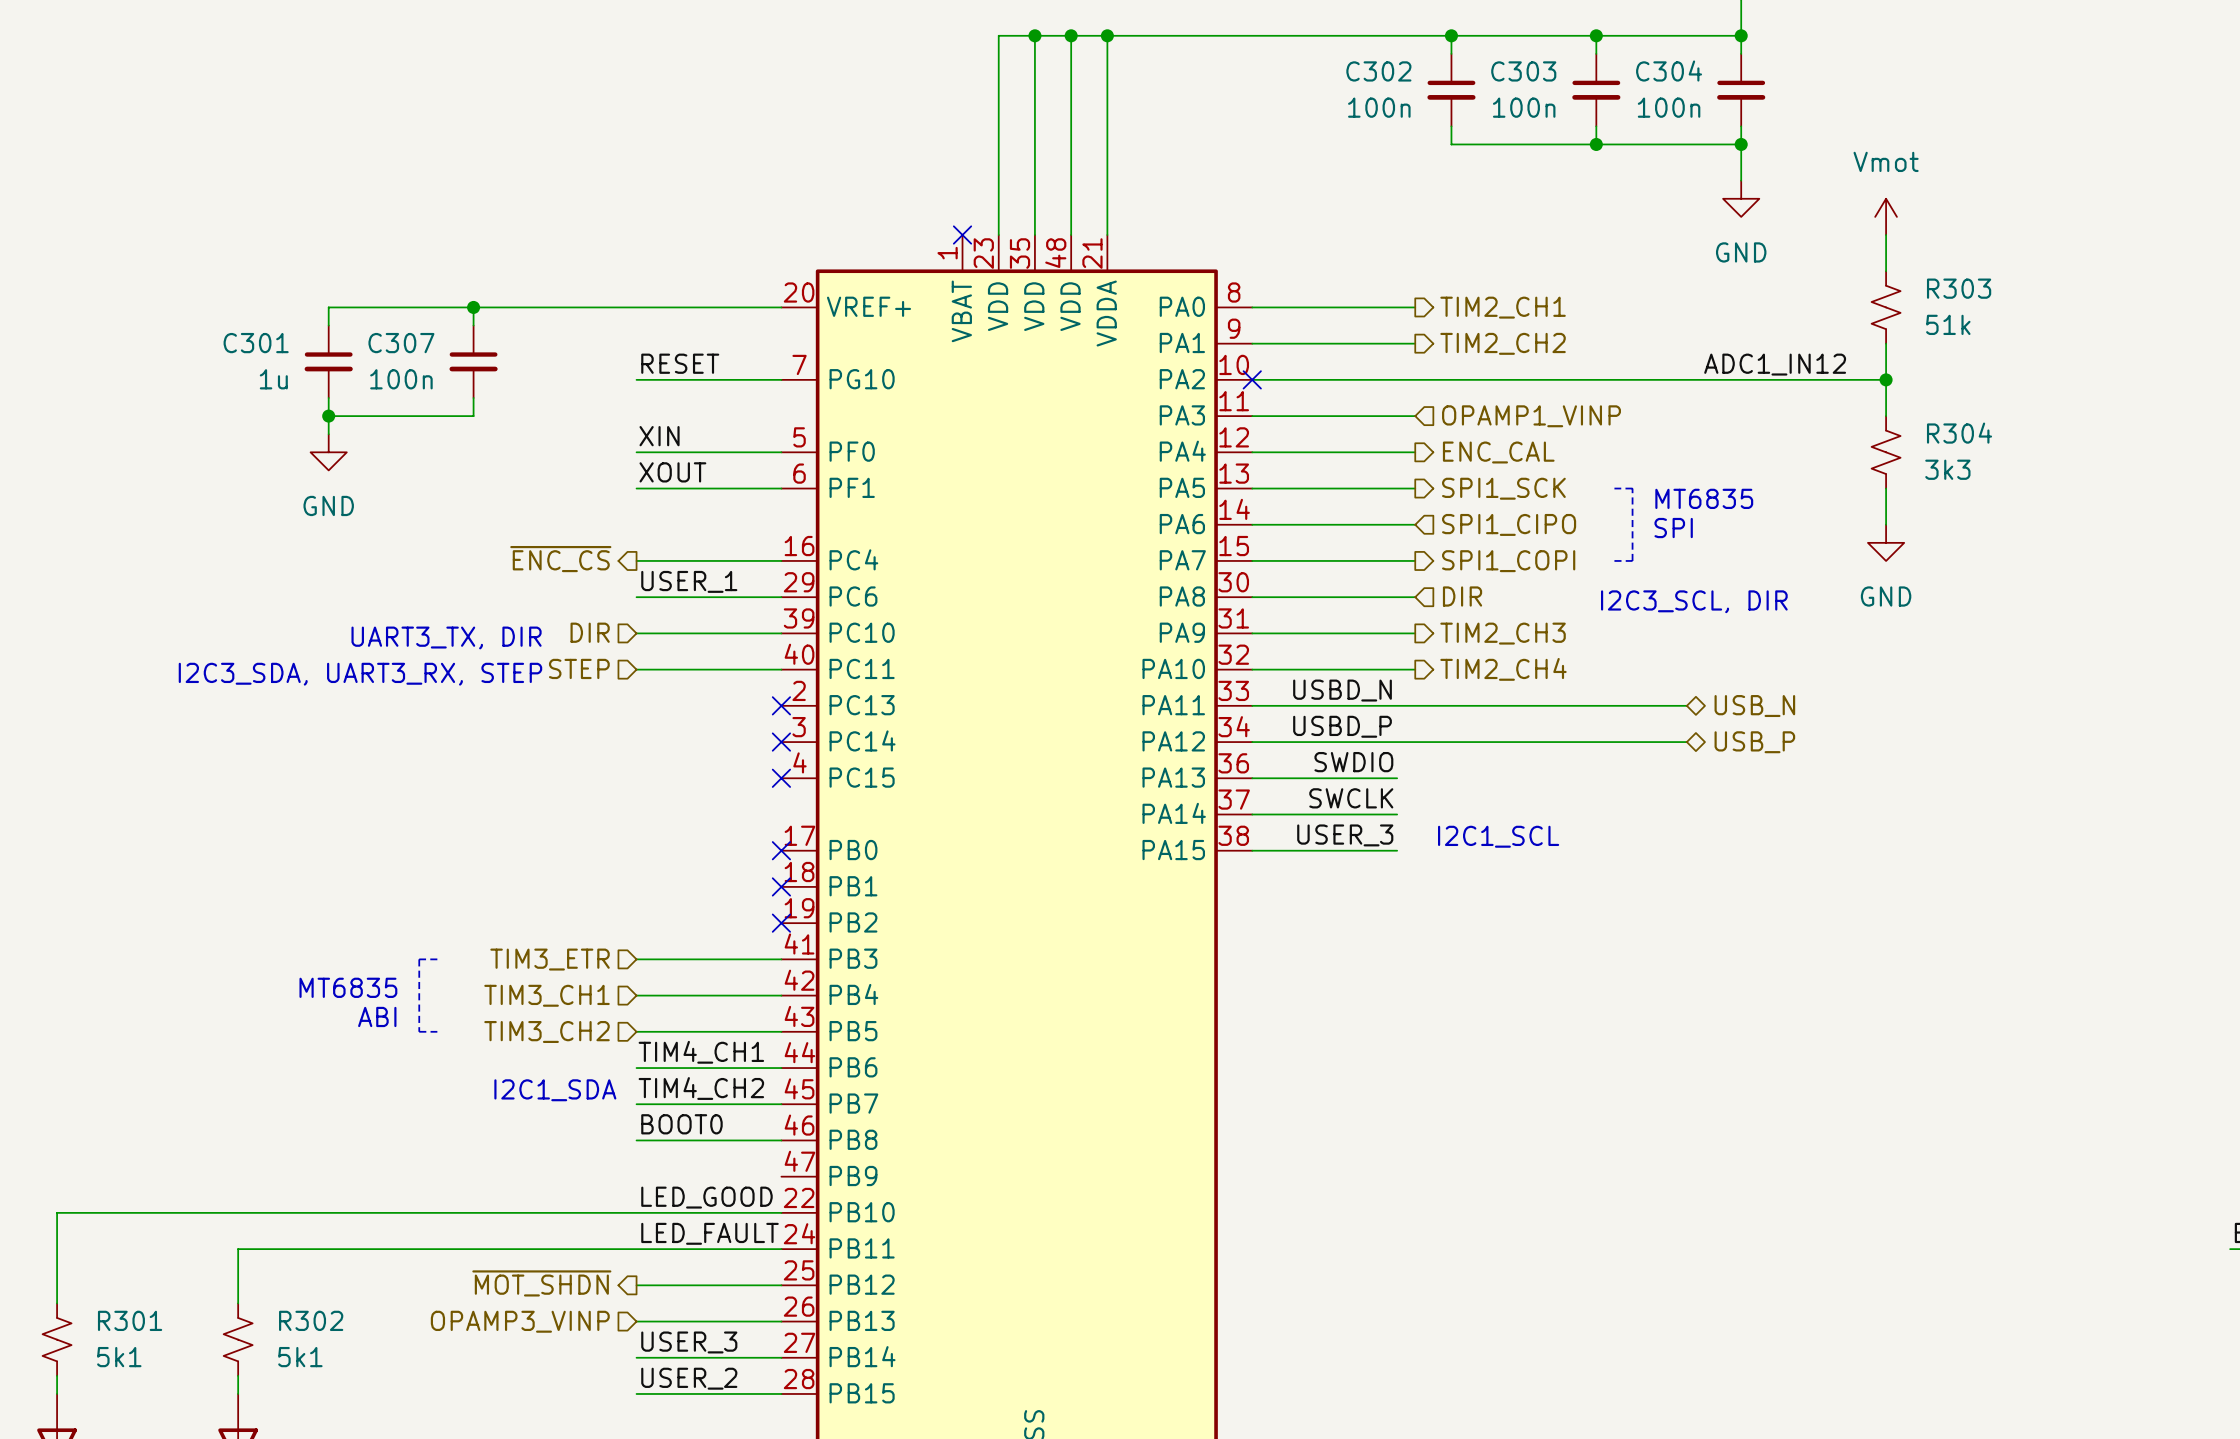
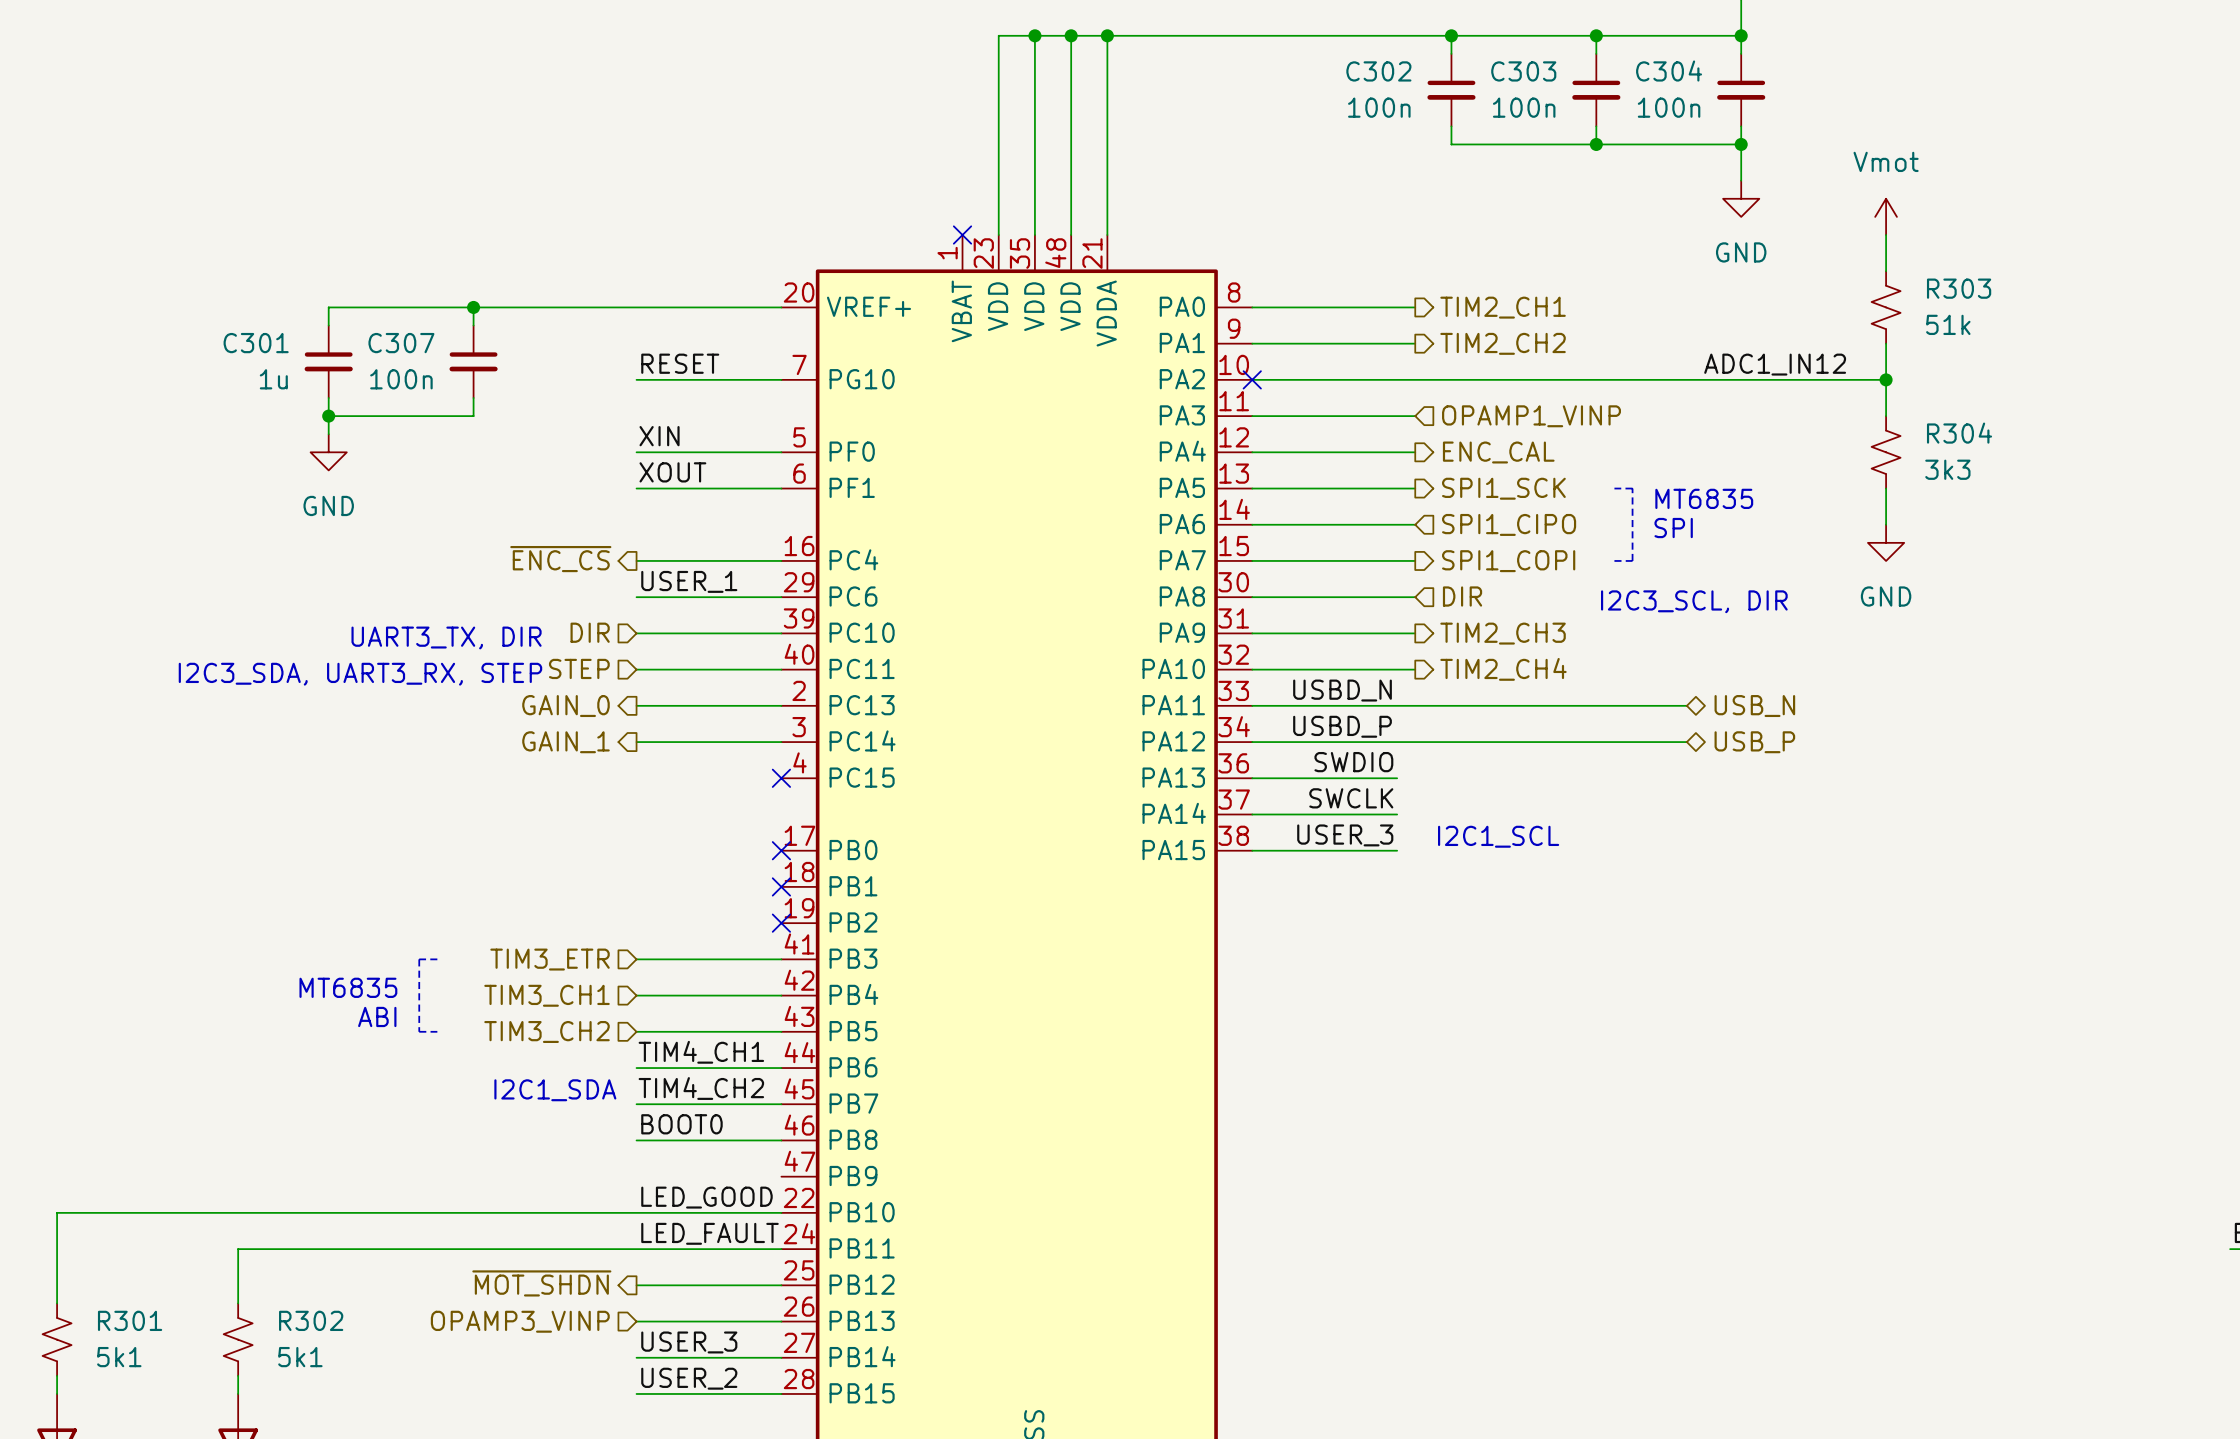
wire: none -> (636, 705) (781, 705)
no-connect mark: (781, 705) -> none
hierarchical label: none -> GAIN_0 (565, 706)
hierarchical label: none -> GAIN_1 (565, 742)
wire: none -> (636, 742) (781, 742)
no-connect mark: (781, 742) -> none

